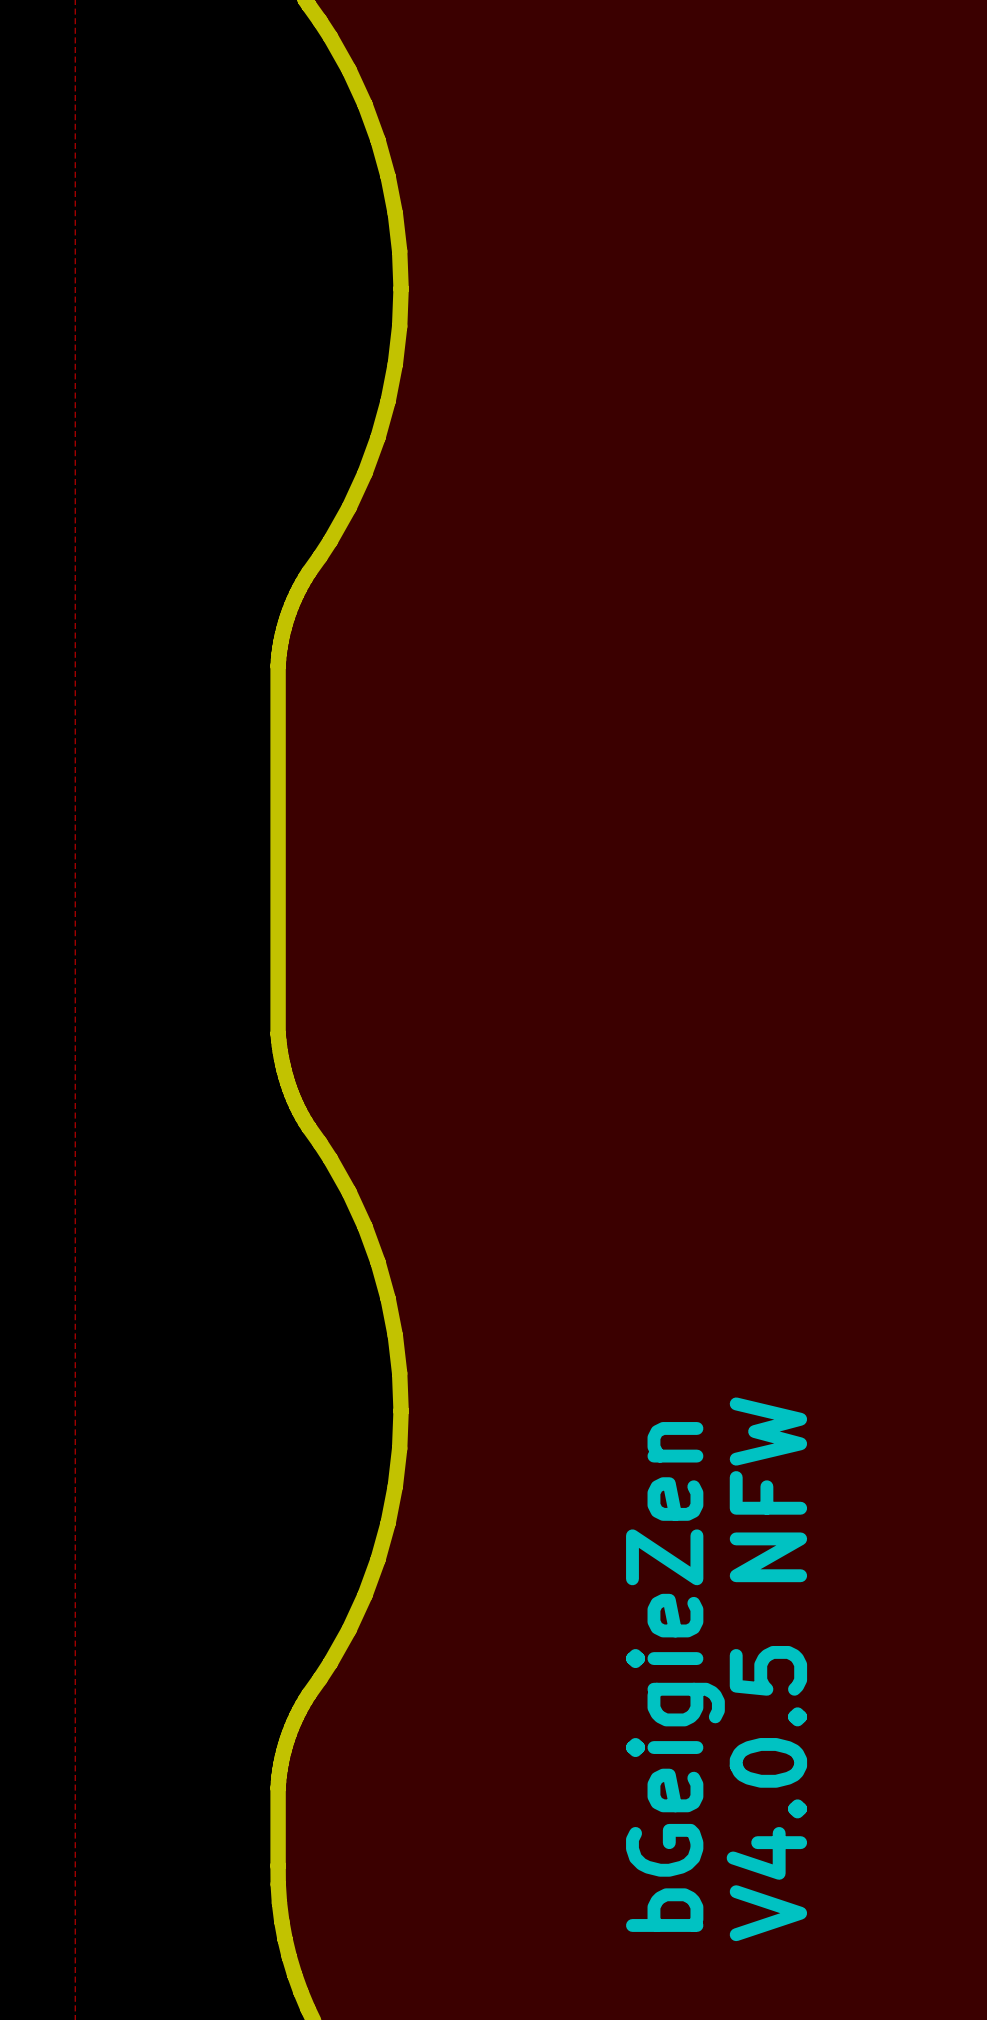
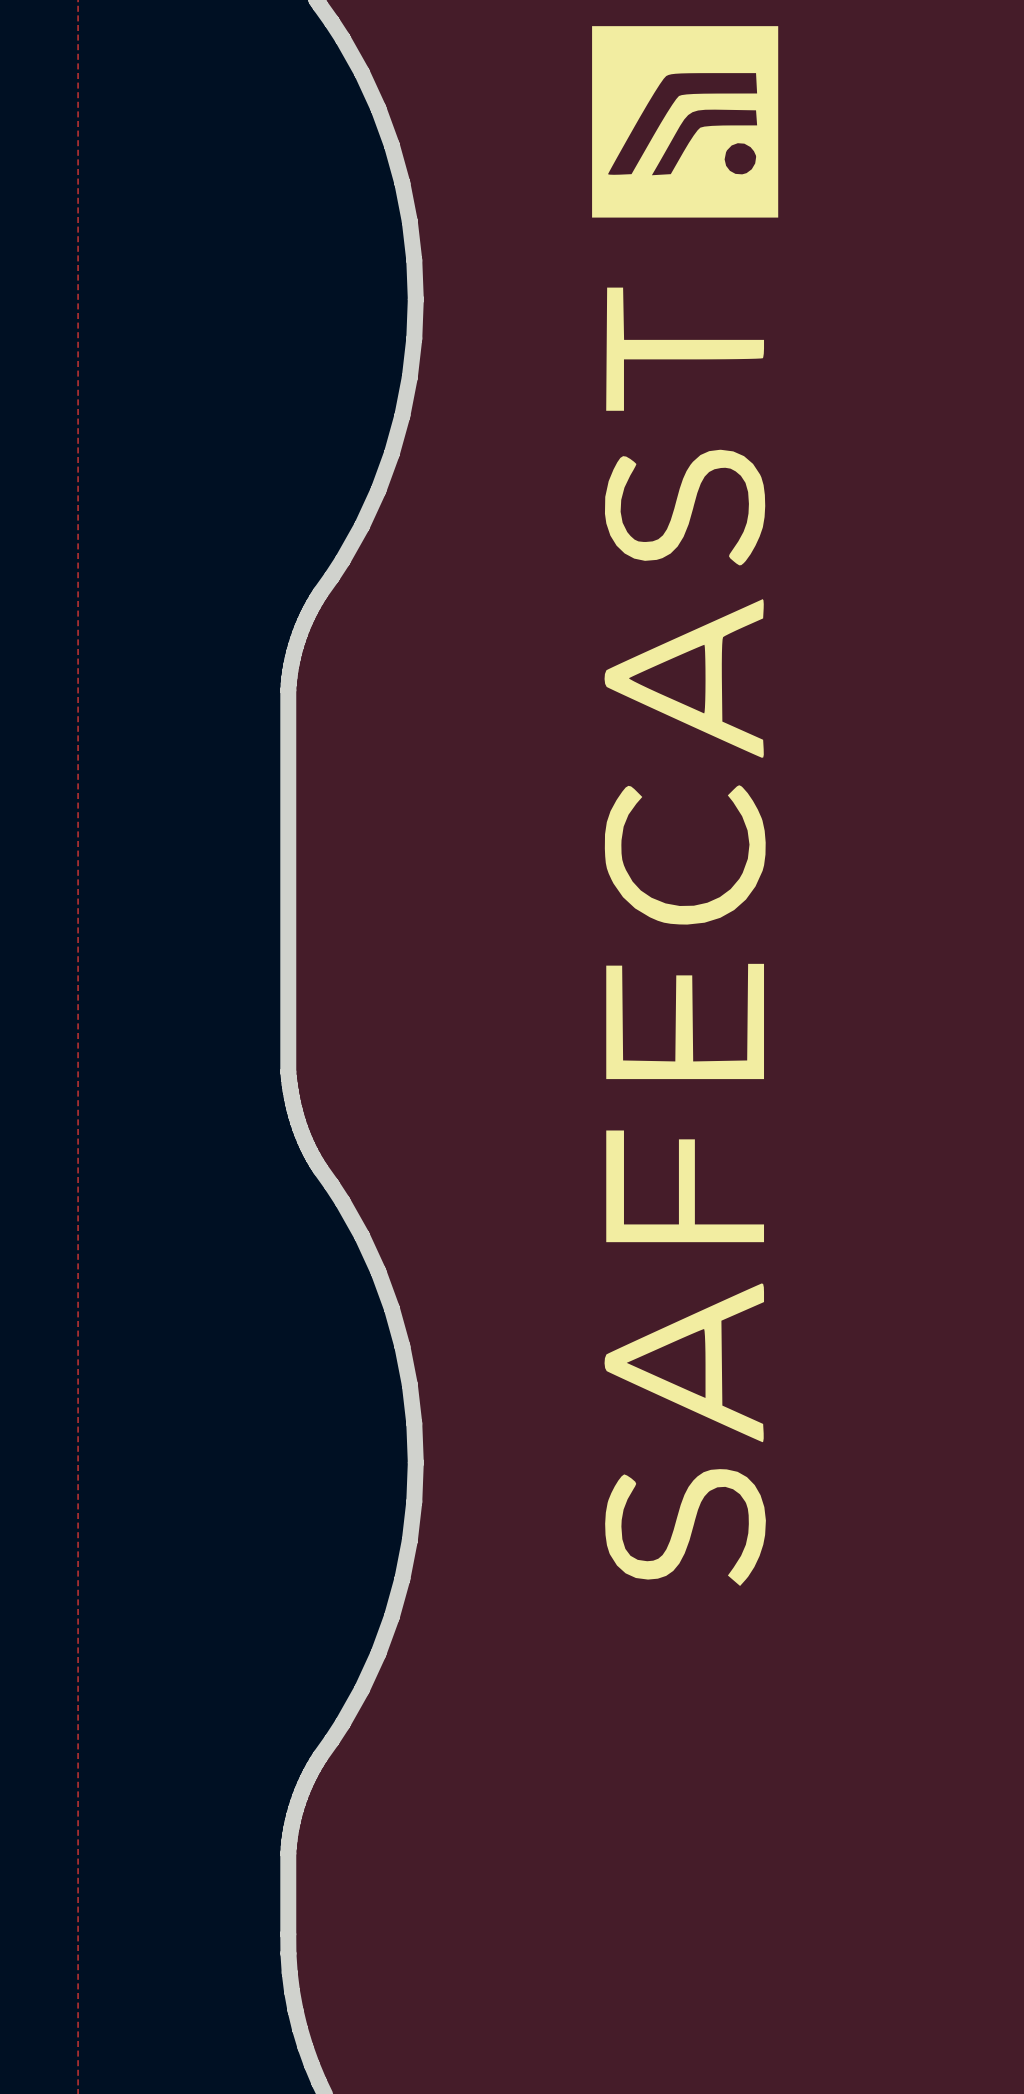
drawing: none -> [592, 26, 779, 1586]
text: V4.0.5 NFW (766, 1669) -> none
text: bGeigieZen (675, 1676) -> none

